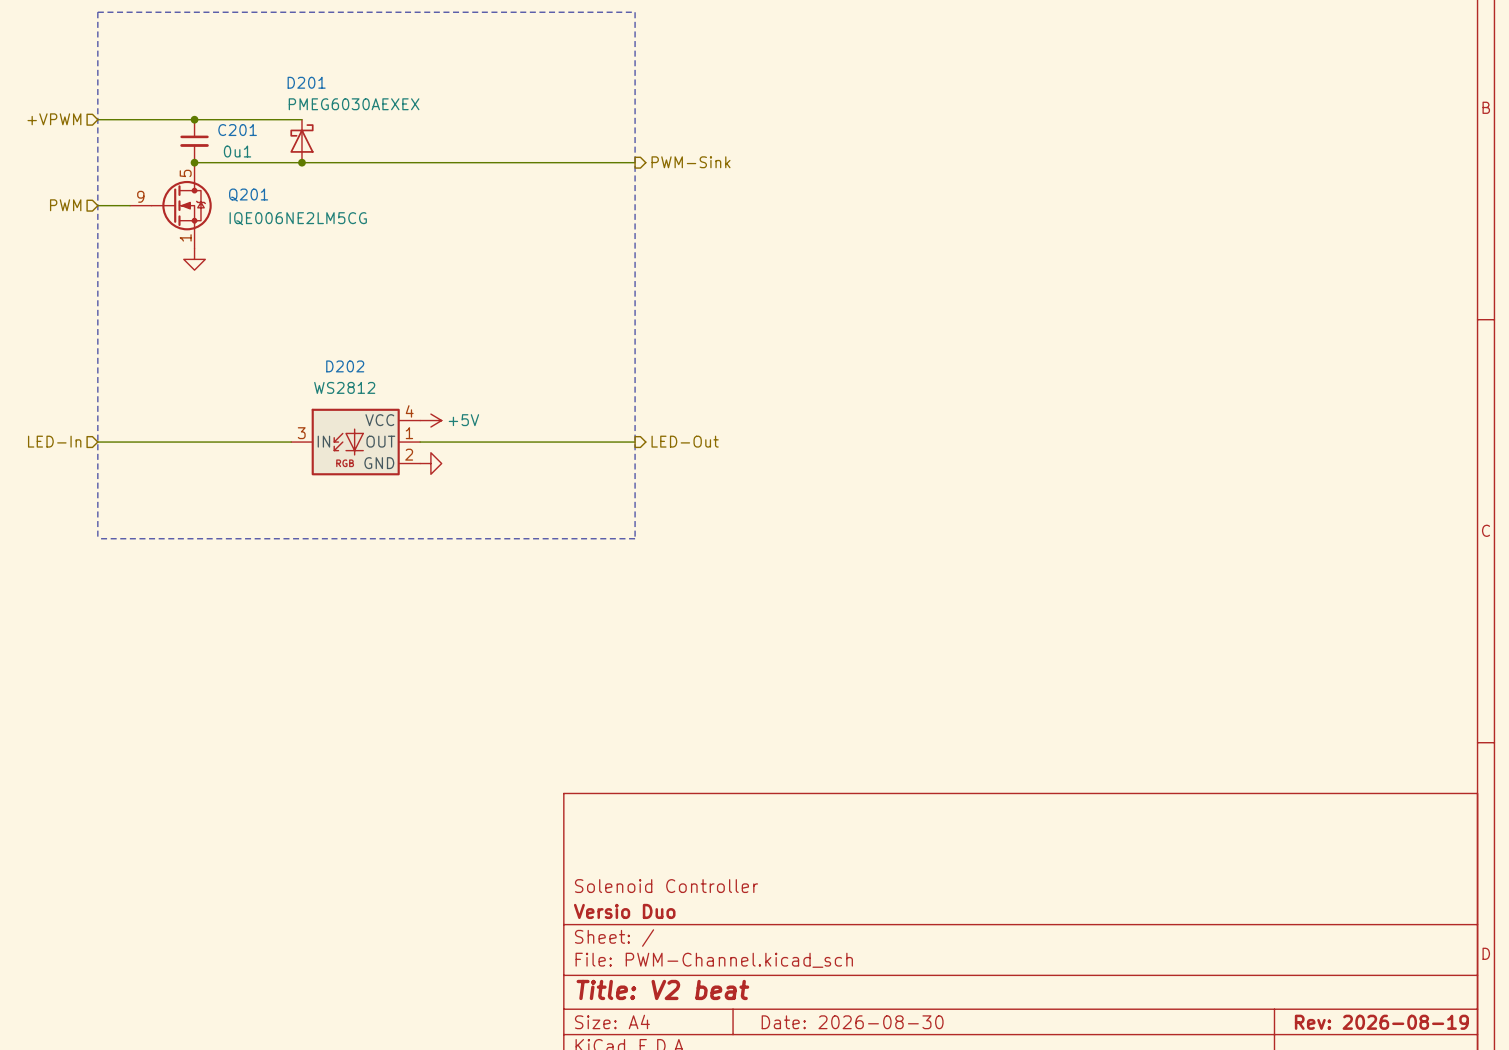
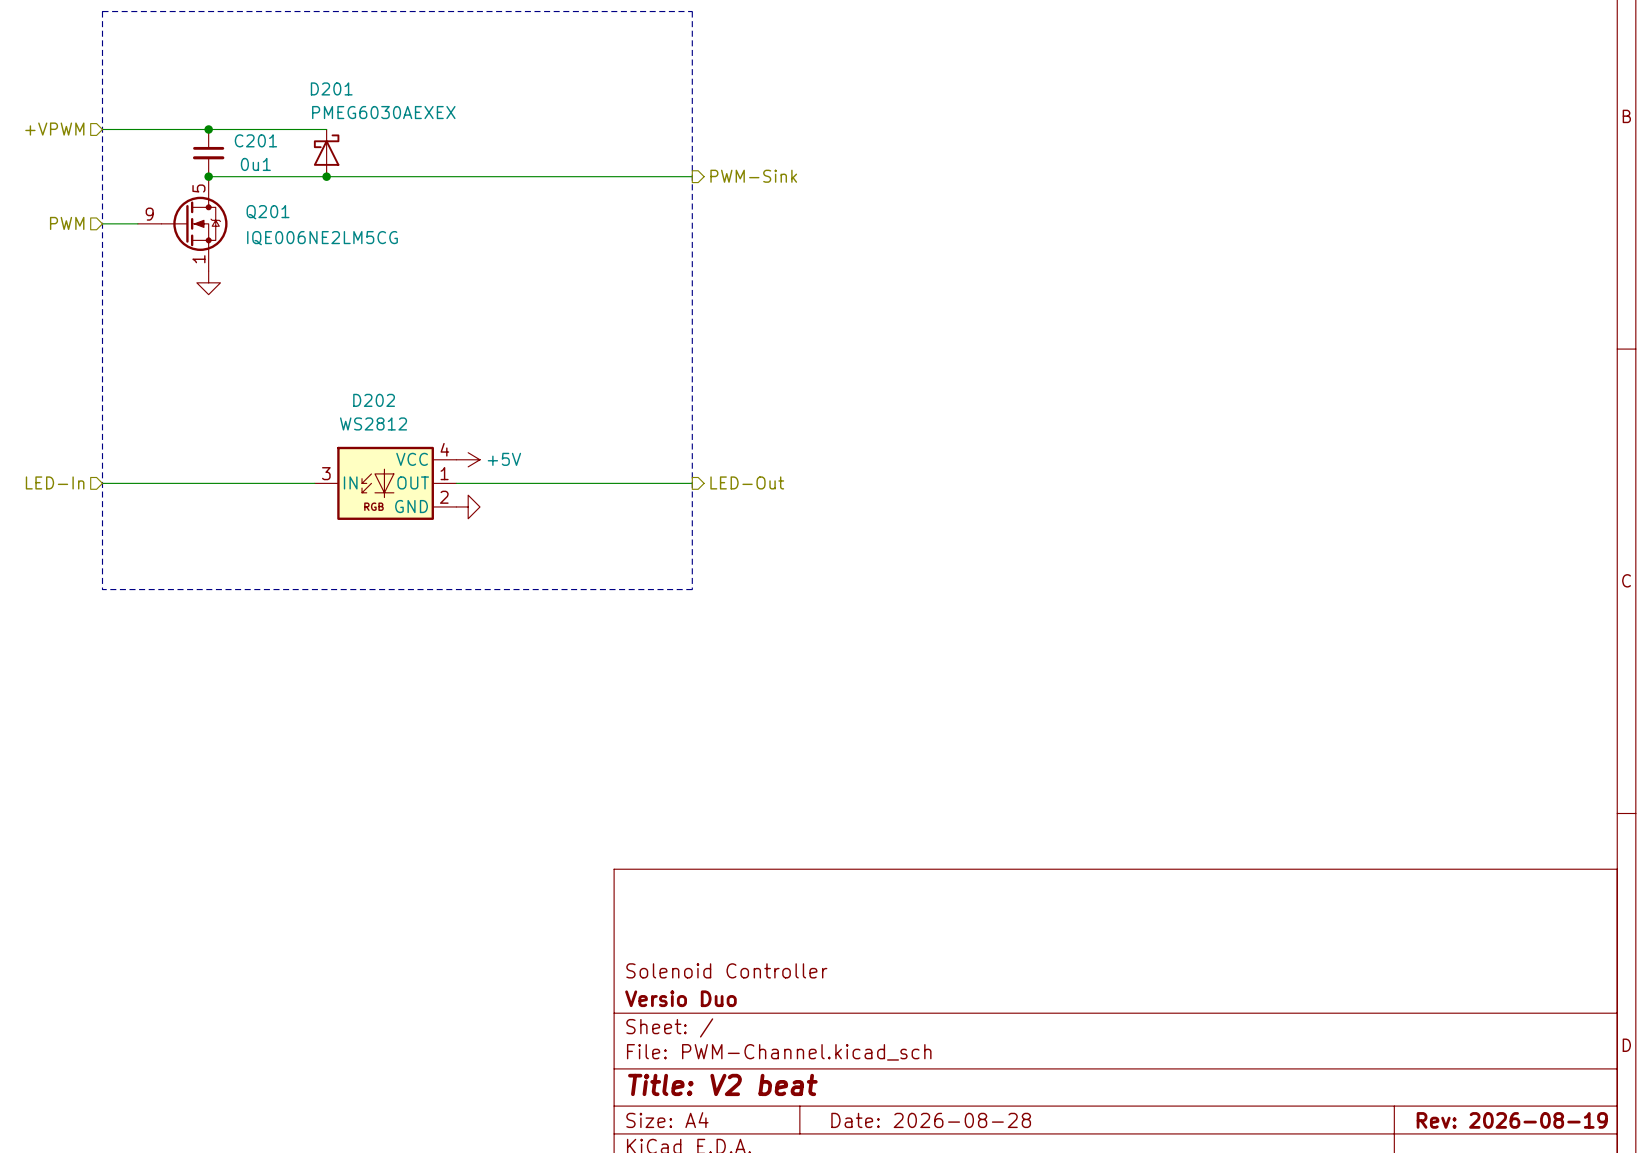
title block: Date: 2026-08-30 (852, 1022) -> Date: 2026-08-28 (931, 1120)

